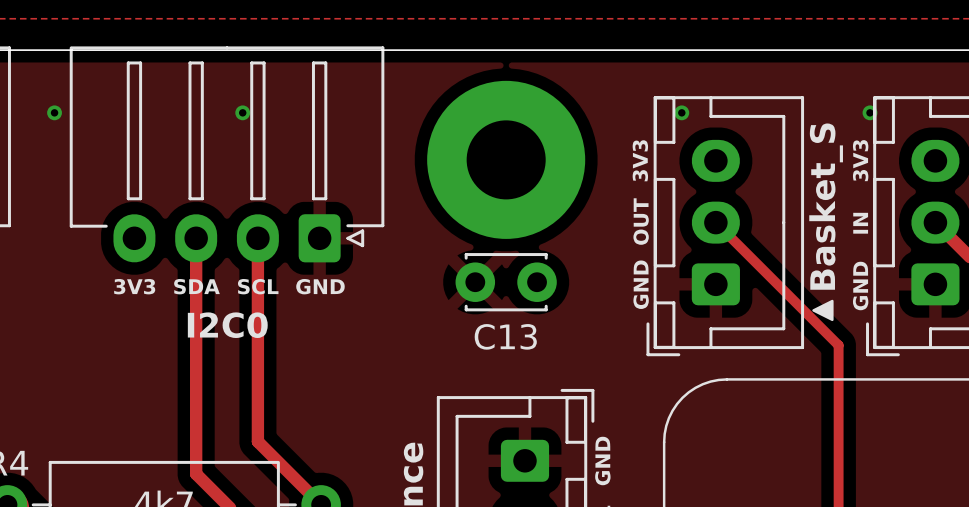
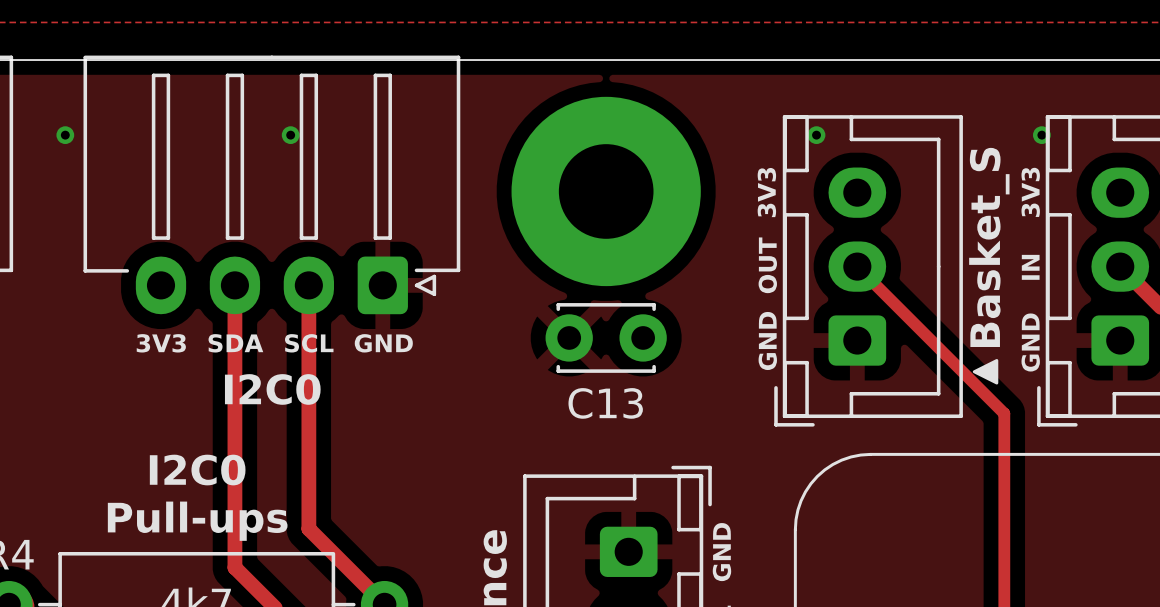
text: none -> I2C0 (197, 470)
text: none -> Pull-ups (197, 521)

